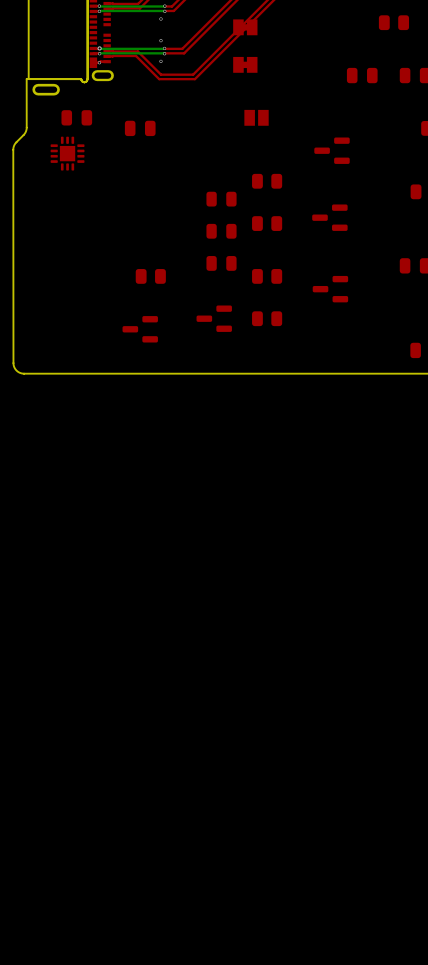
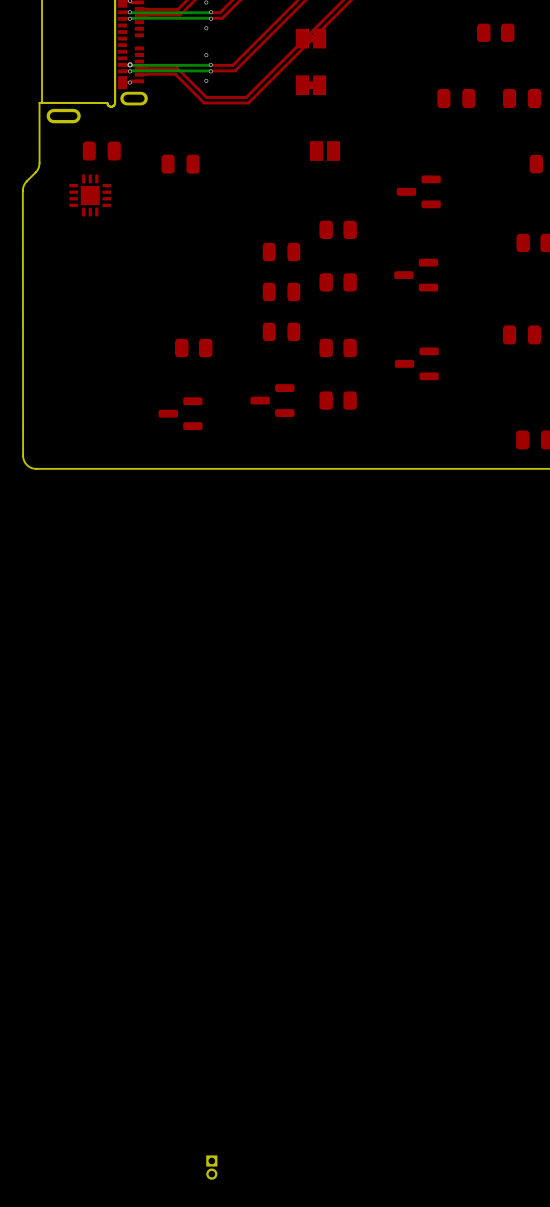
part: none -> (211, 1167)

